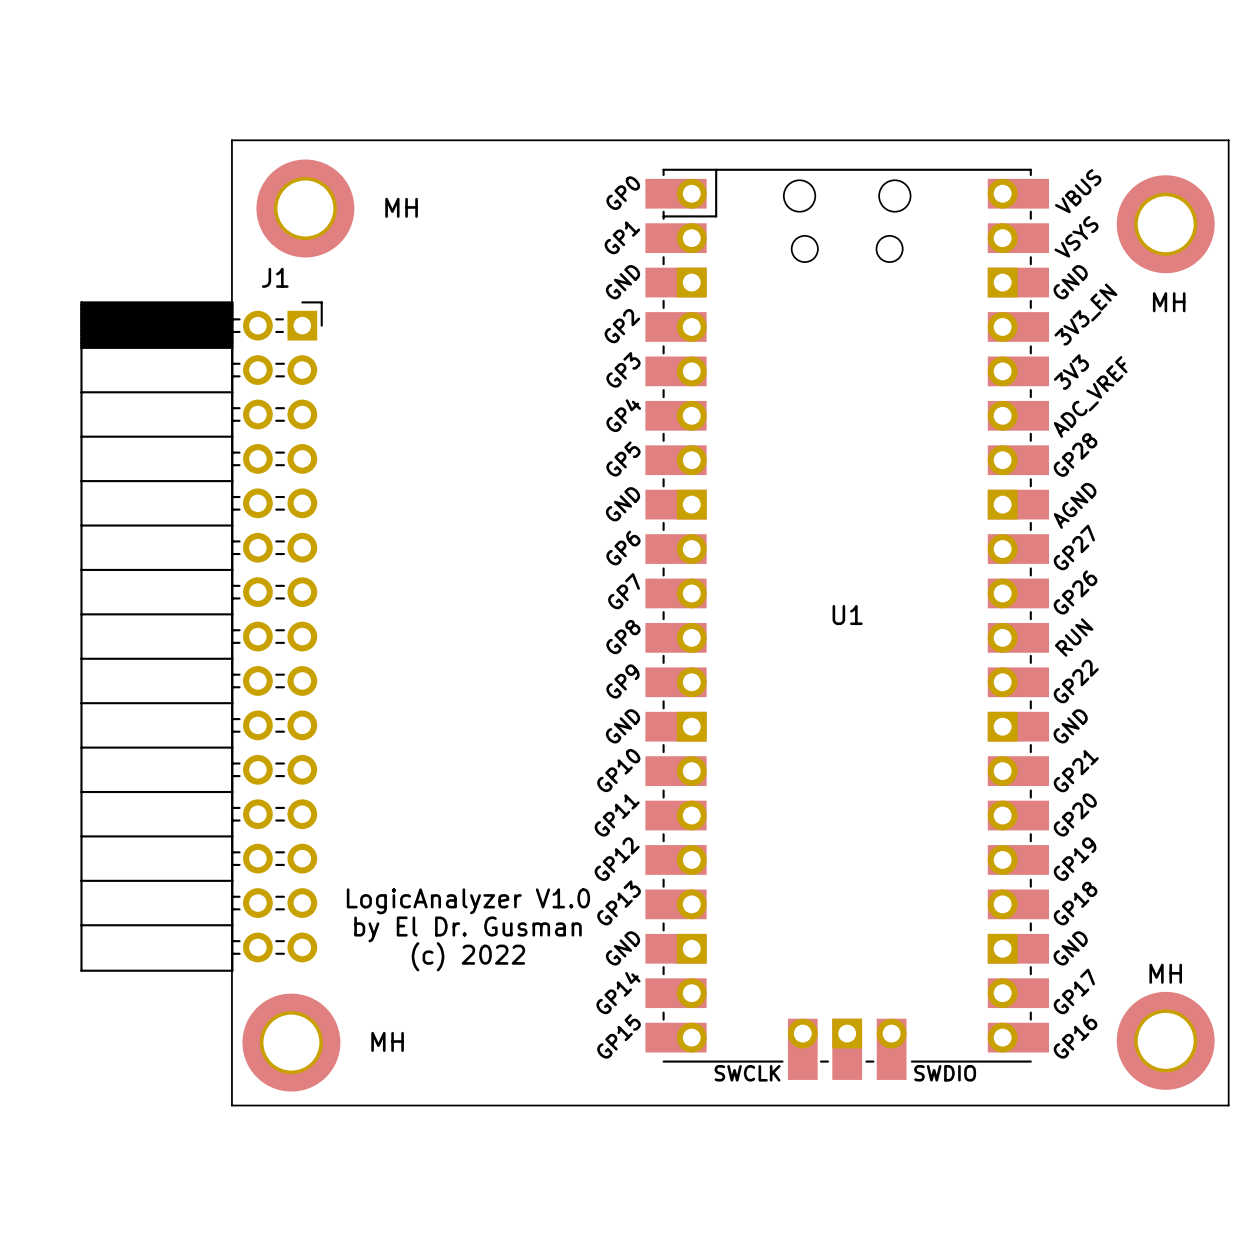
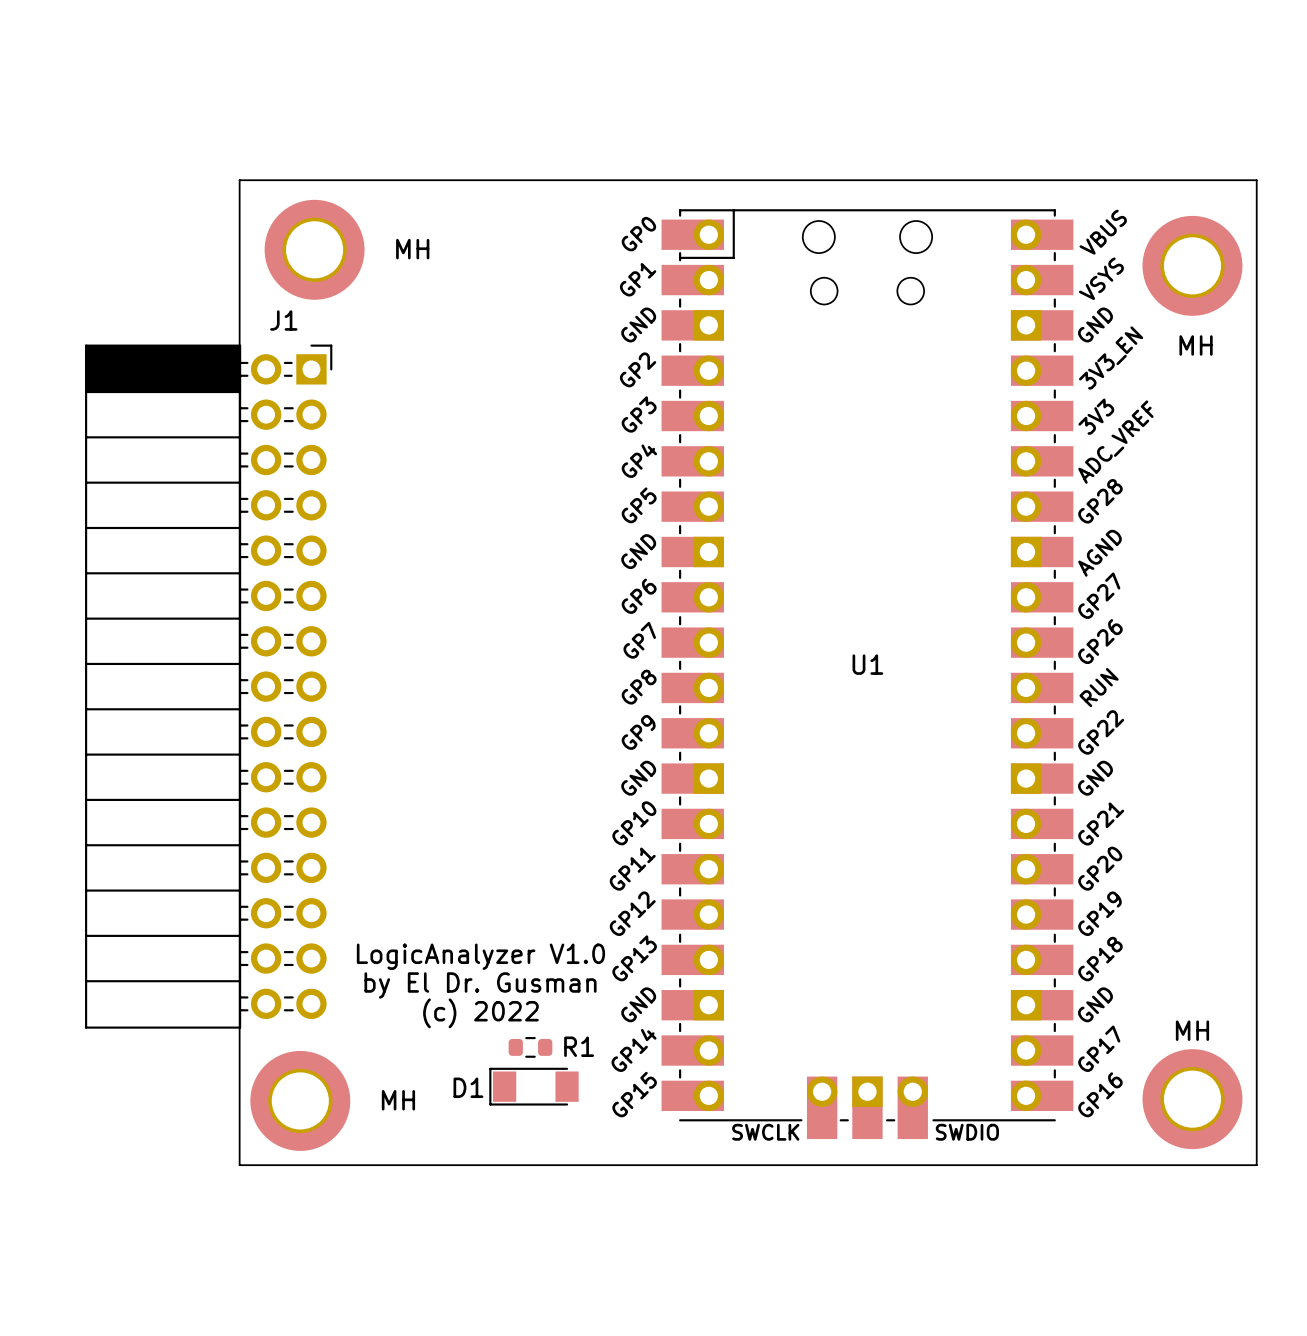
R1: none -> (530, 1047)
D1: none -> (533, 1086)

